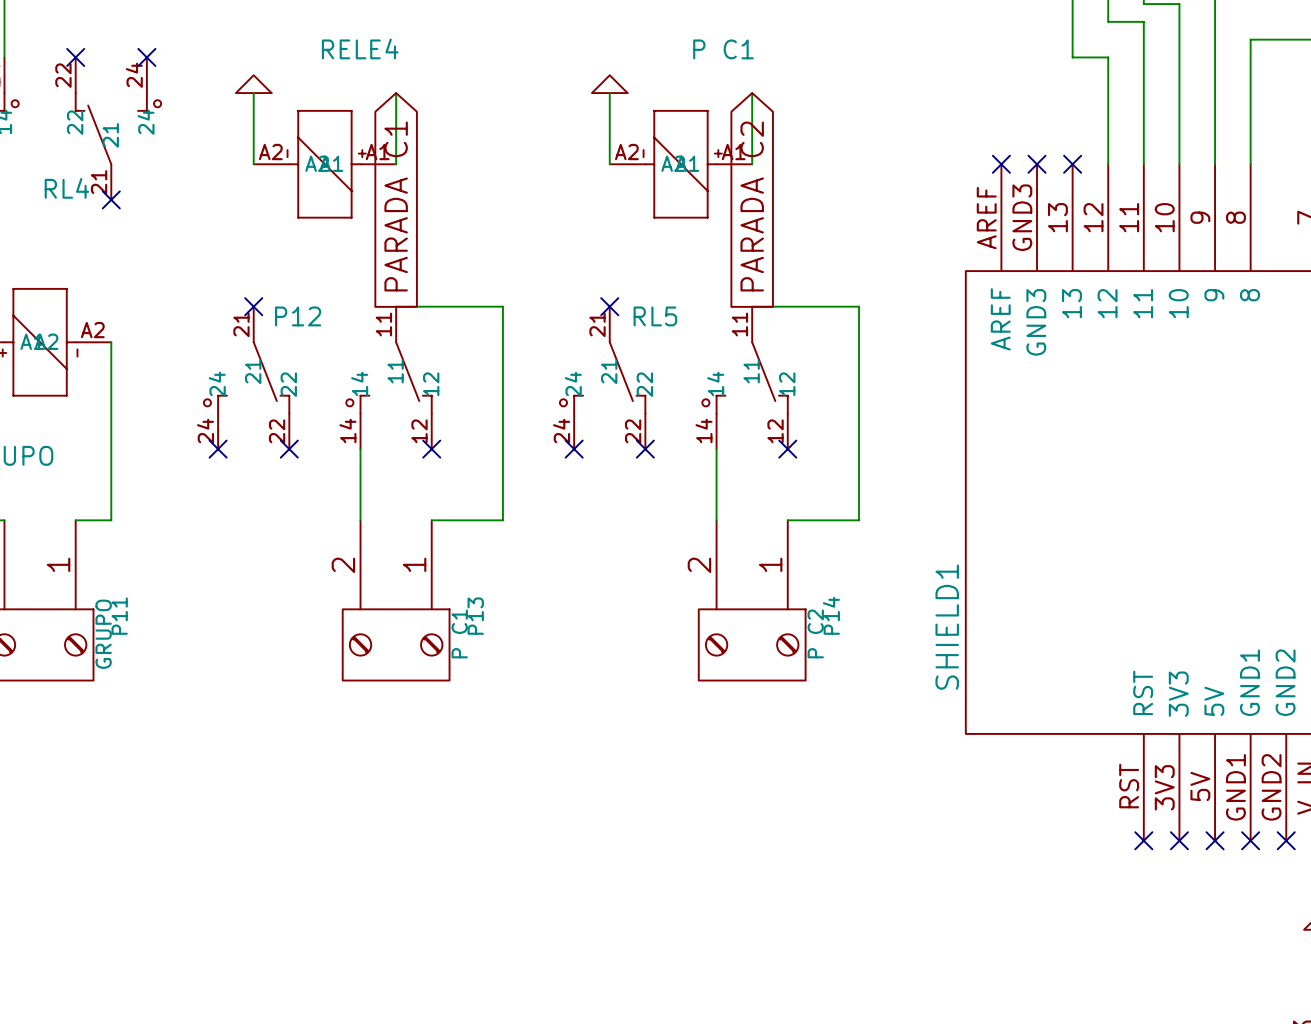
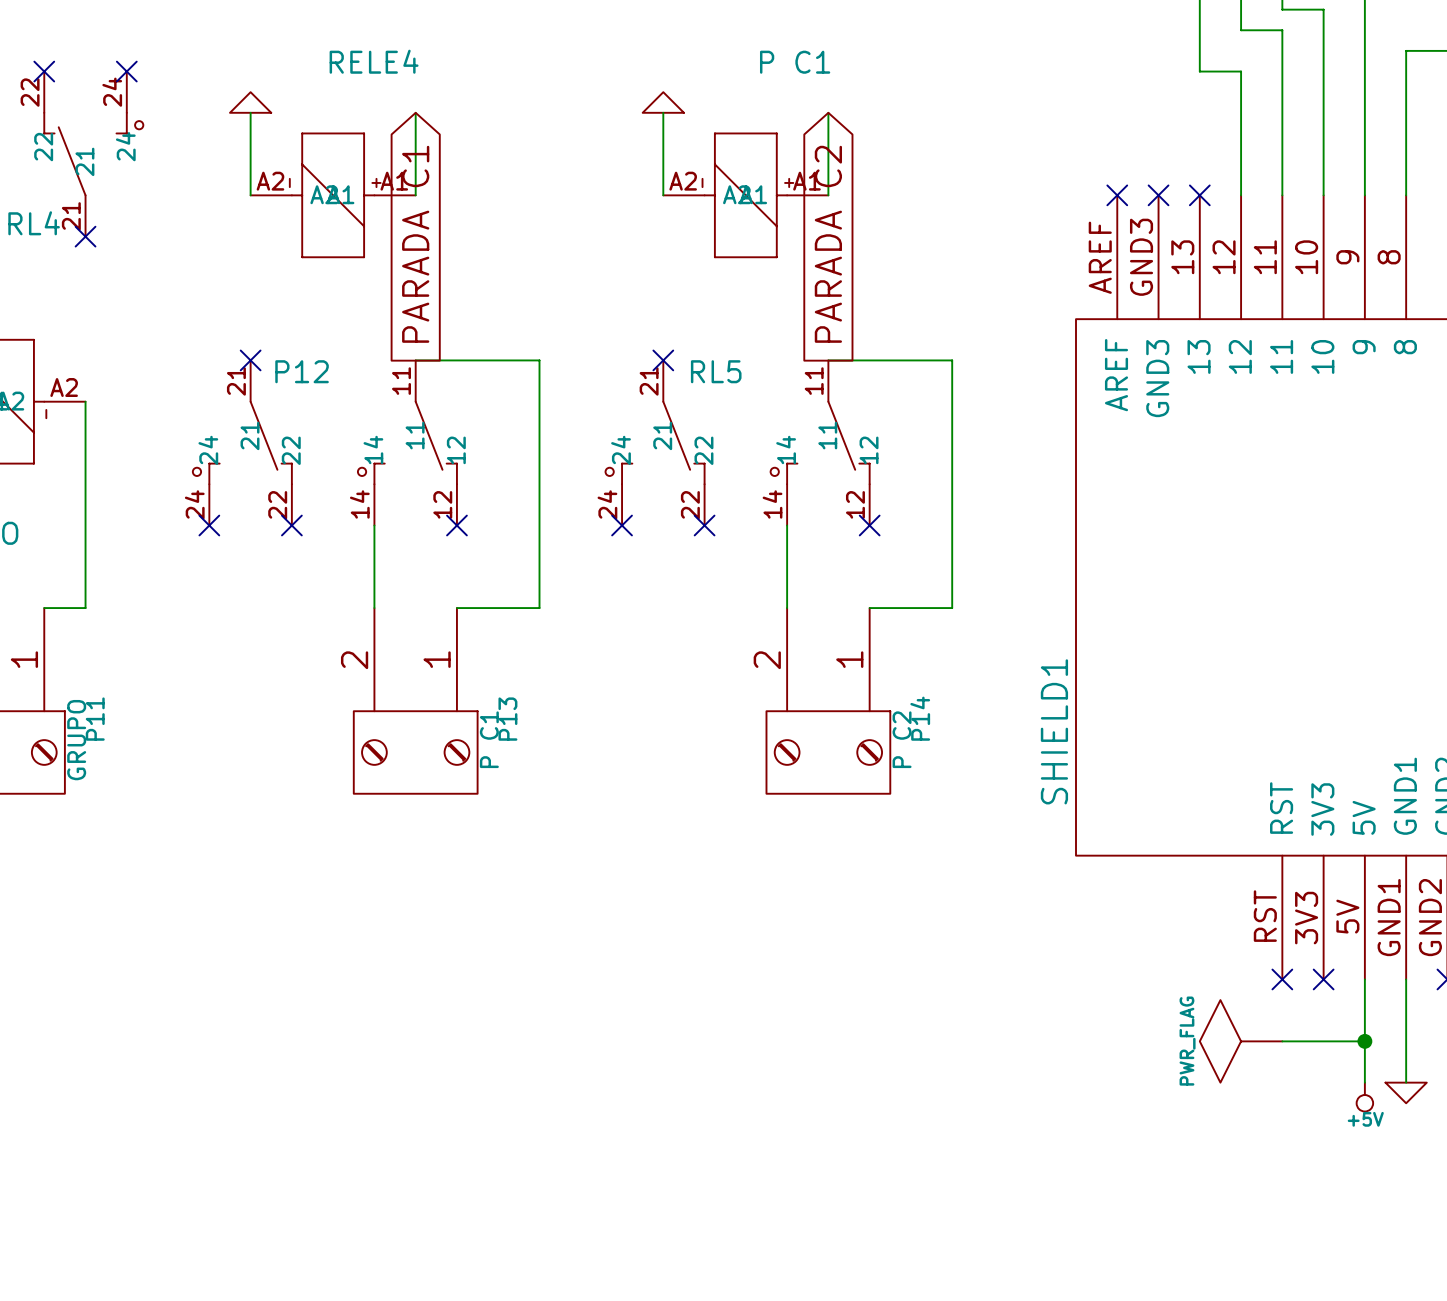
wire: none -> (1364, 979) (1364, 1082)
no-connect mark: (1215, 840) -> none
wire: none -> (1406, 979) (1406, 1082)
no-connect mark: (1250, 840) -> none
power symbol: none -> PWR_FLAG (1241, 1041)
wire: none -> (1282, 1041) (1364, 1041)
junction: none -> (1364, 1041)
power symbol: none -> (1406, 1092)
power symbol: none -> +5V (1364, 1097)

